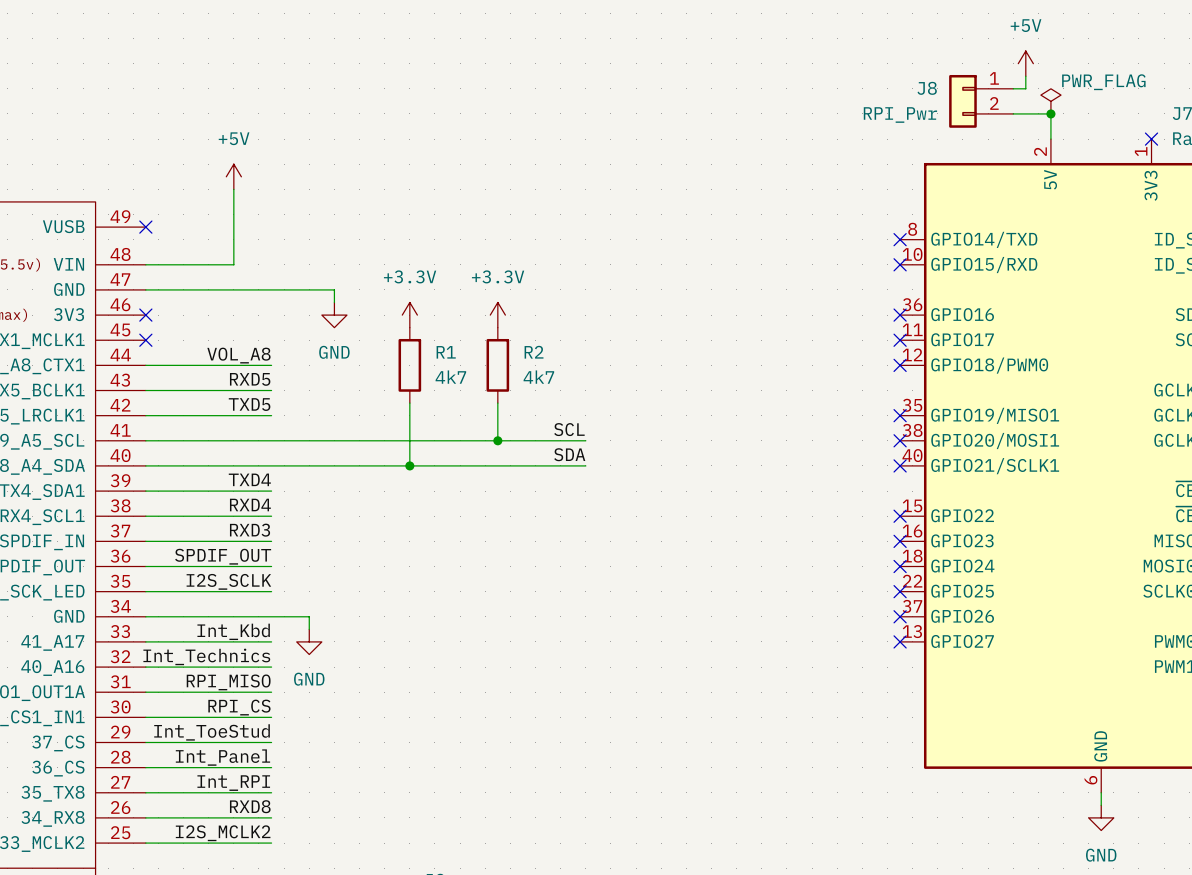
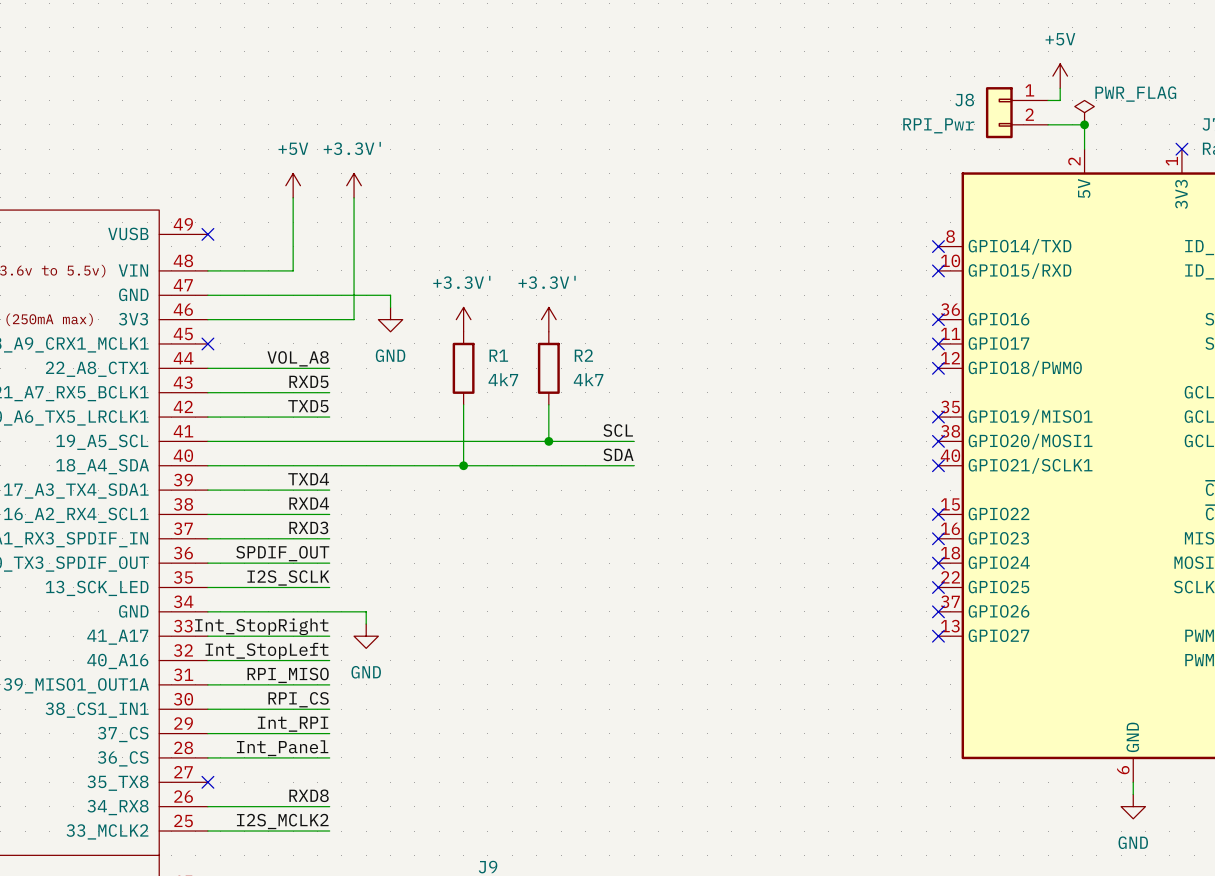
power symbol: none -> +3.3V' (354, 185)
wire: none -> (354, 197) (354, 319) (207, 319)
no-connect mark: (145, 315) -> none
power symbol: +3.3V (409, 315) -> +3.3V' (463, 319)
power symbol: +3.3V (497, 315) -> +3.3V' (548, 319)
label: Int_Kbd (233, 631) -> Int_StopRight (261, 626)
label: Int_Technics (206, 656) -> Int_StopLeft (266, 651)
label: Int_ToeStud (212, 732) -> Int_RPI (293, 724)
label: Int_RPI (233, 783) -> none
wire: (145, 792) (271, 792) -> none
no-connect mark: none -> (207, 782)

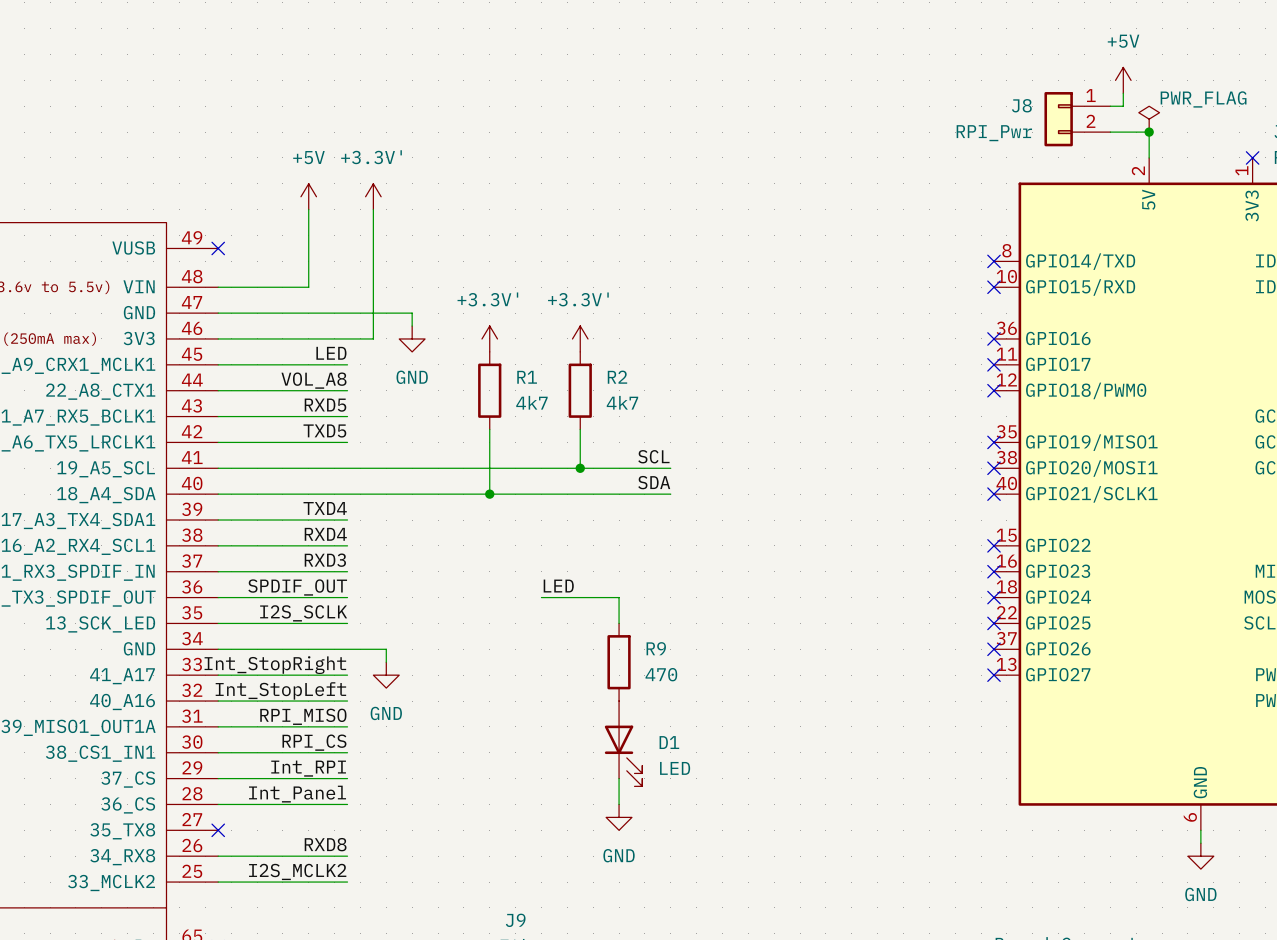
label: none -> LED (331, 353)
wire: none -> (218, 364) (347, 364)
no-connect mark: (207, 343) -> none
label: none -> LED (558, 586)
wire: none -> (541, 597) (619, 597) (619, 623)
R9: none -> 470 (619, 662)
D1: none -> LED (623, 743)
wire: none -> (619, 778) (619, 804)
power symbol: none -> GND (619, 817)

